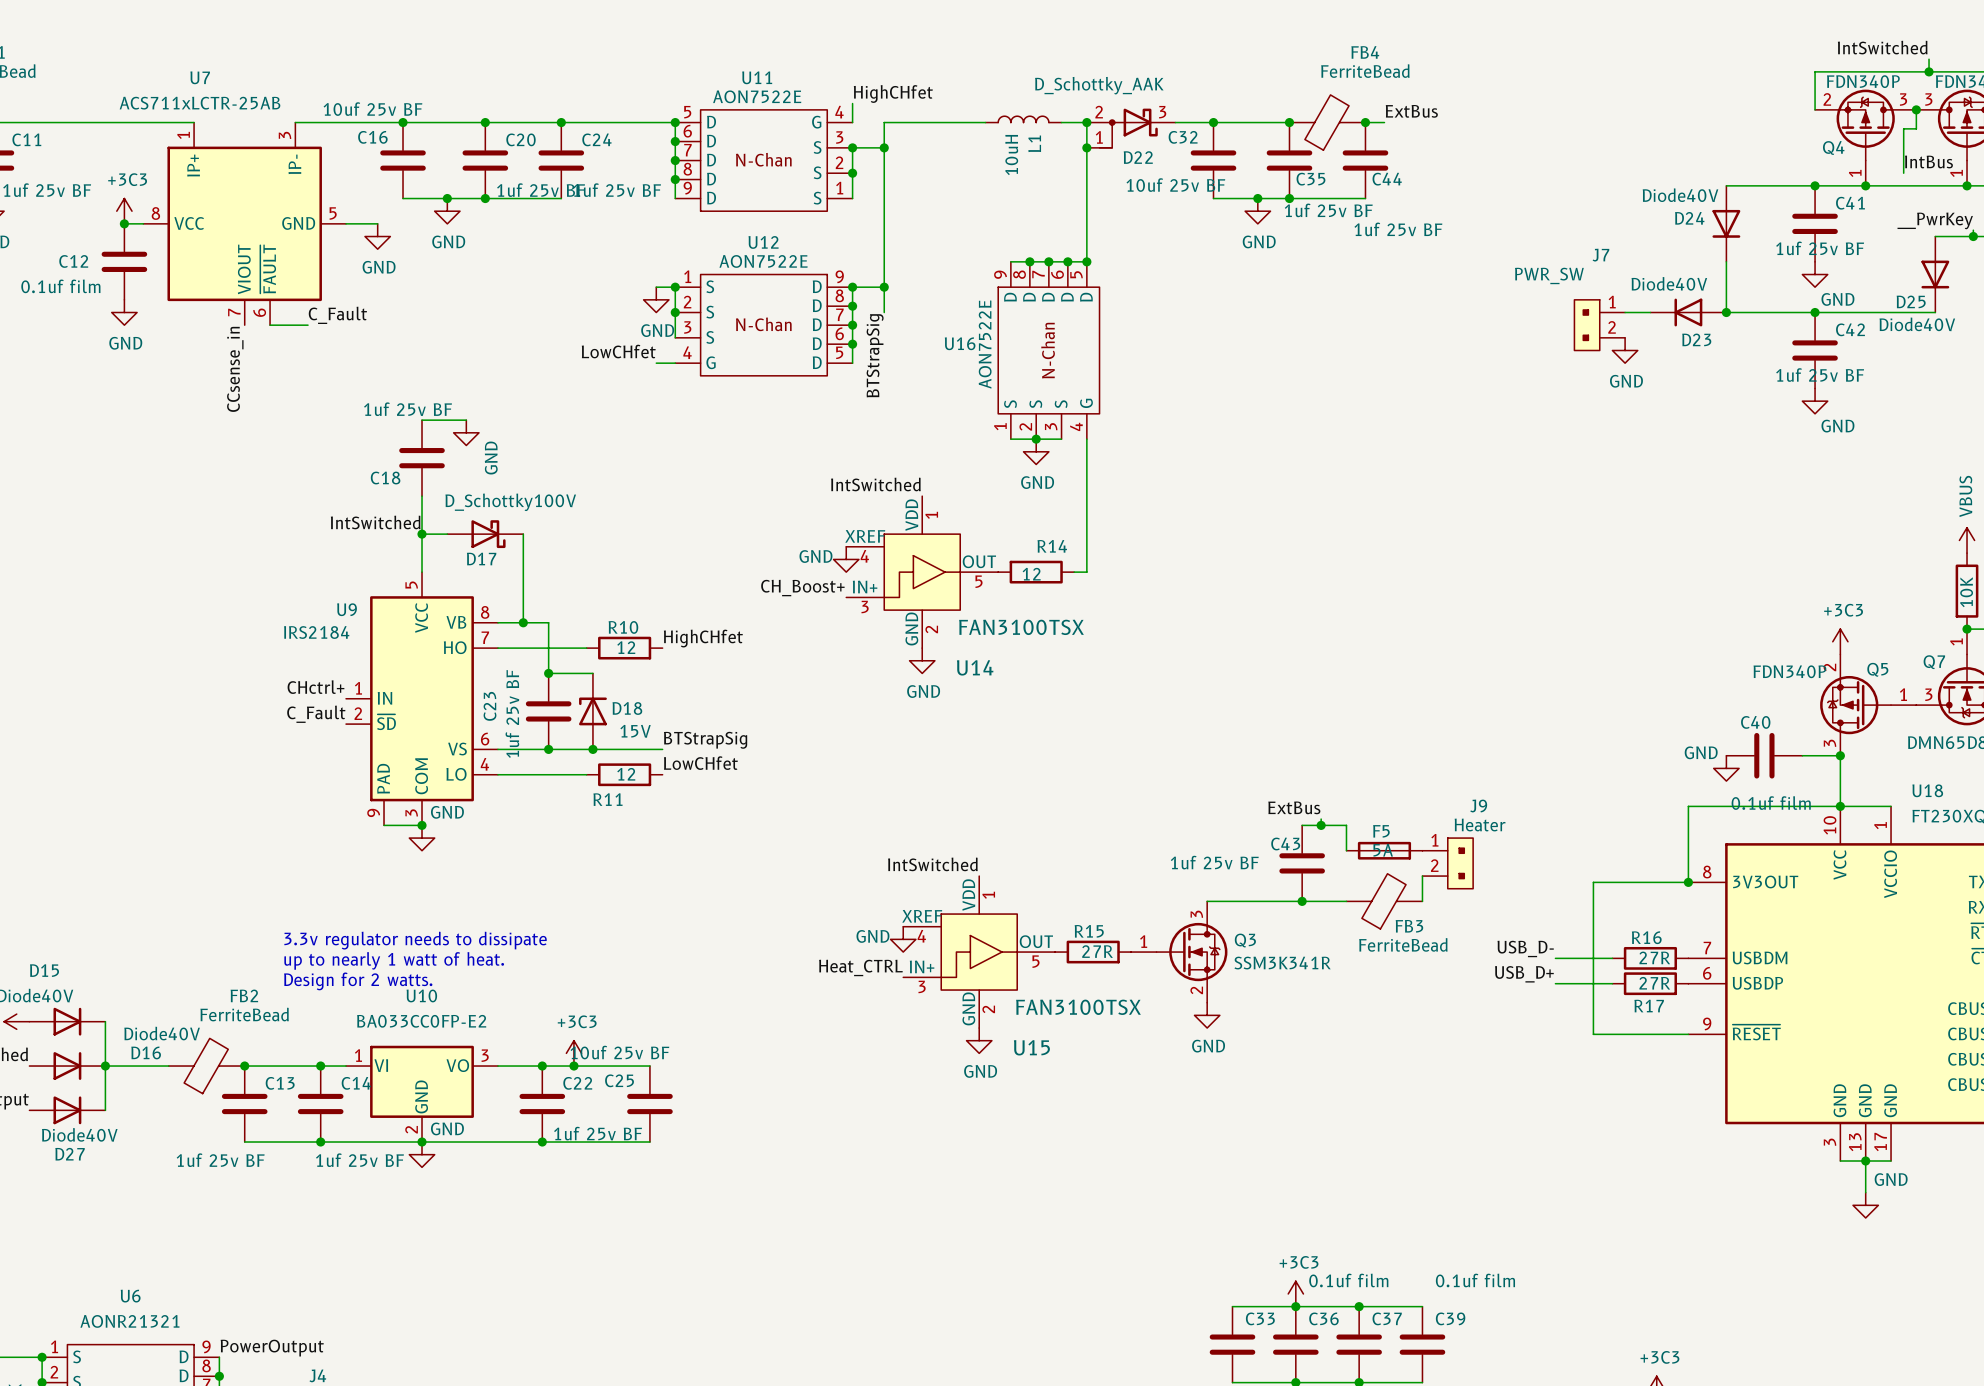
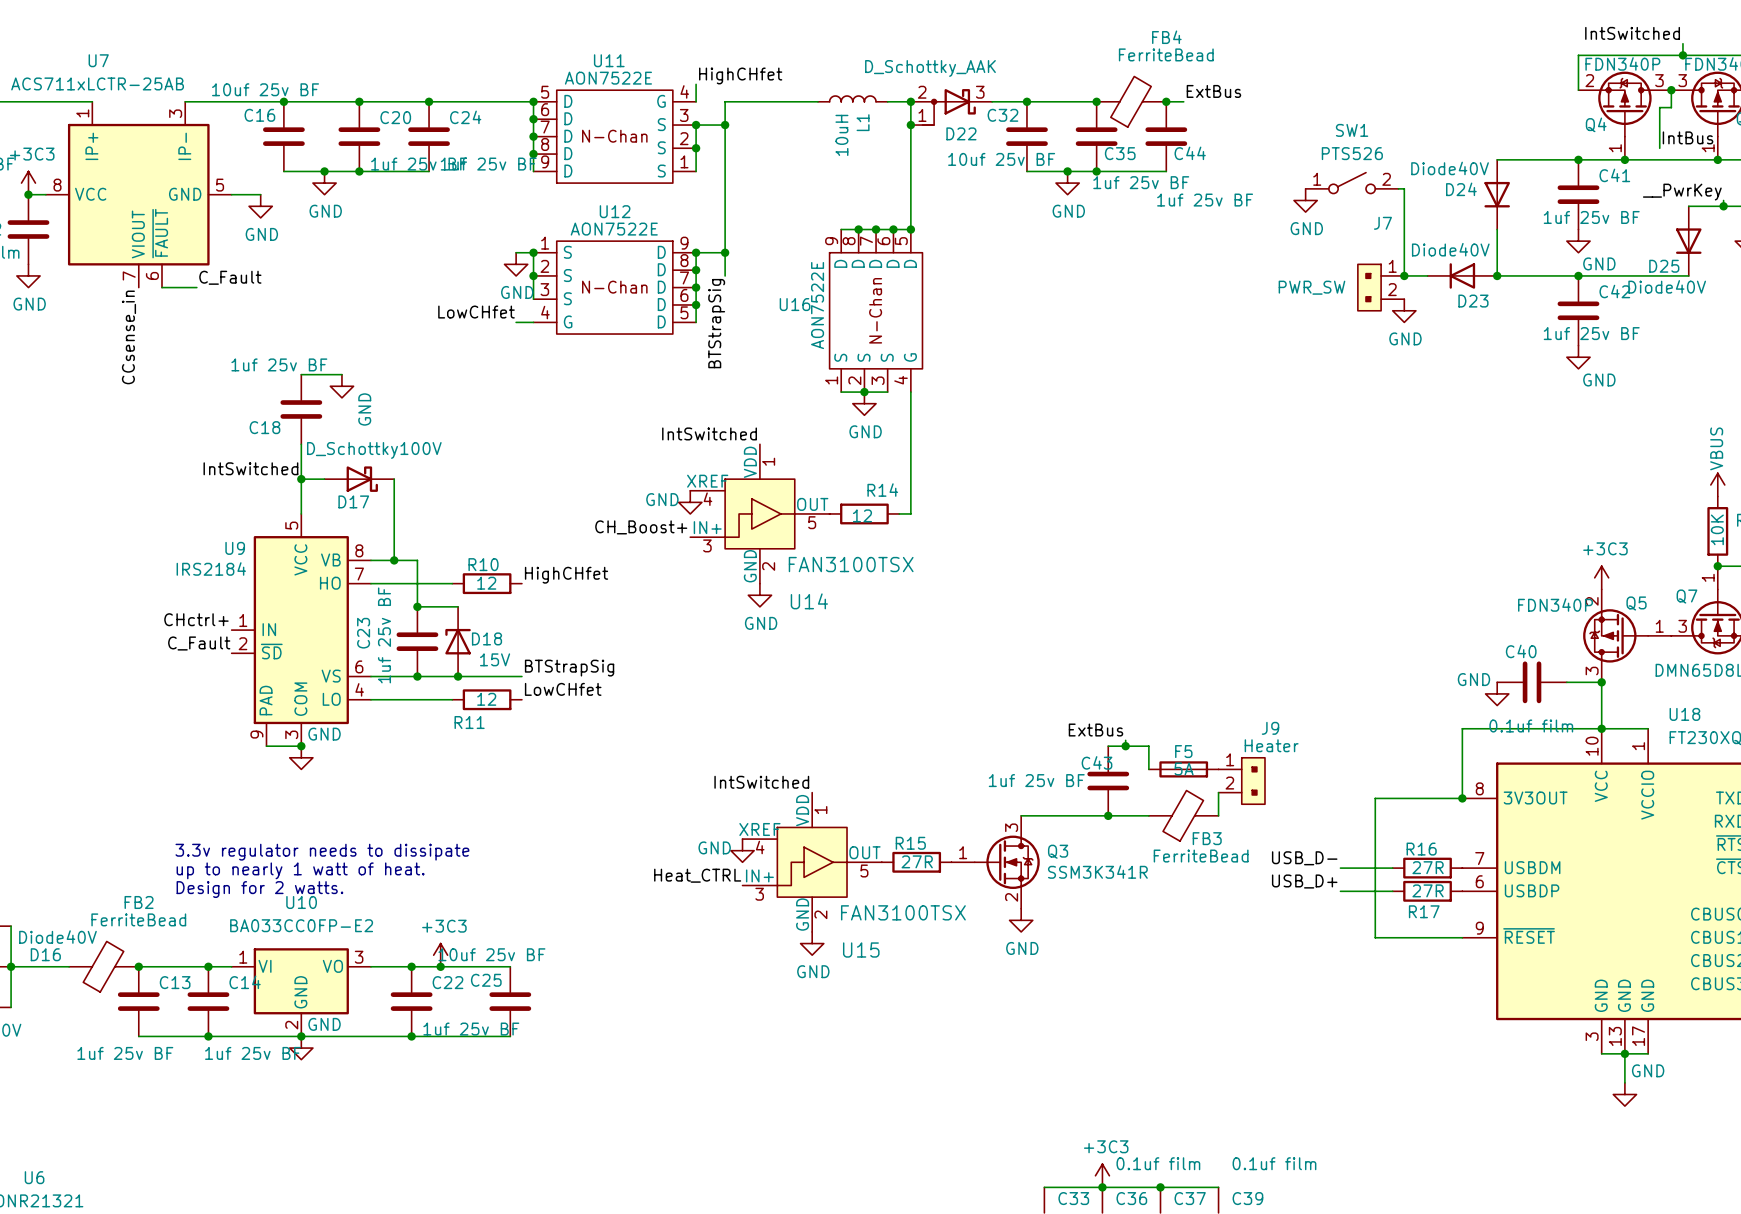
SW1: none -> PTS526 (1352, 183)
wire: none -> (1398, 188) (1404, 188) (1404, 275)
power symbol: none -> GND (1305, 200)
J7 value position: PWR_SW (1549, 275) -> PWR_SW (1311, 287)
junction: none -> (1404, 275)

